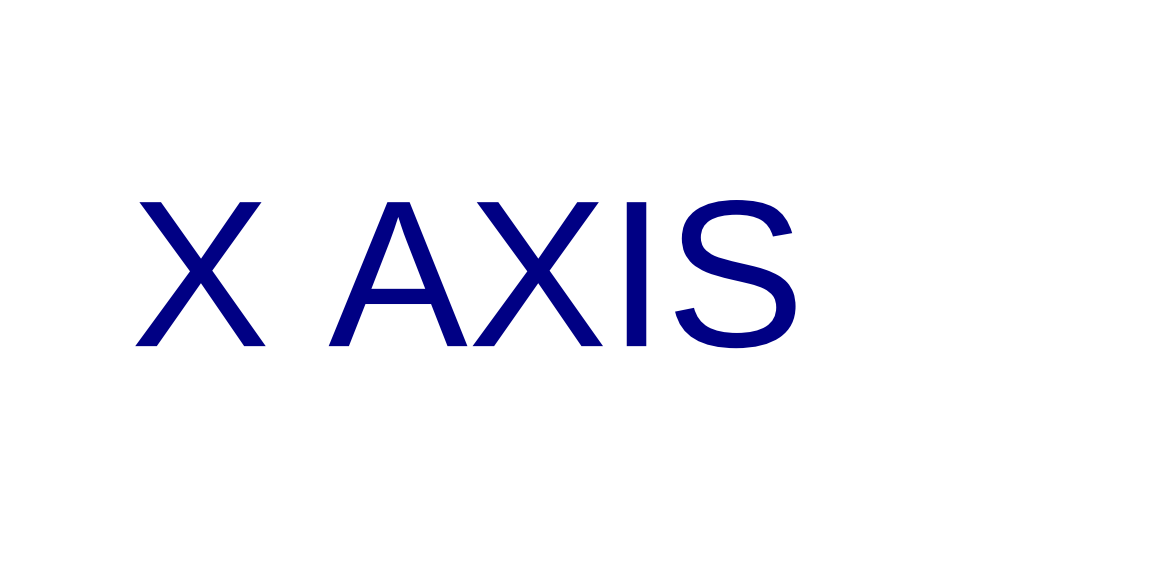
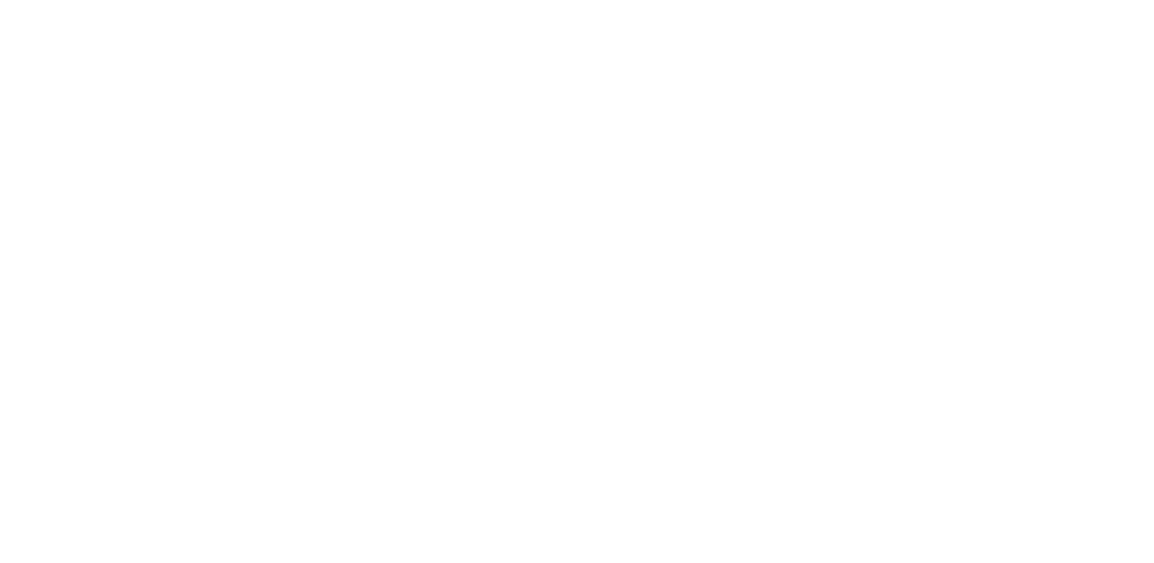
text: X AXIS (465, 274) -> none

